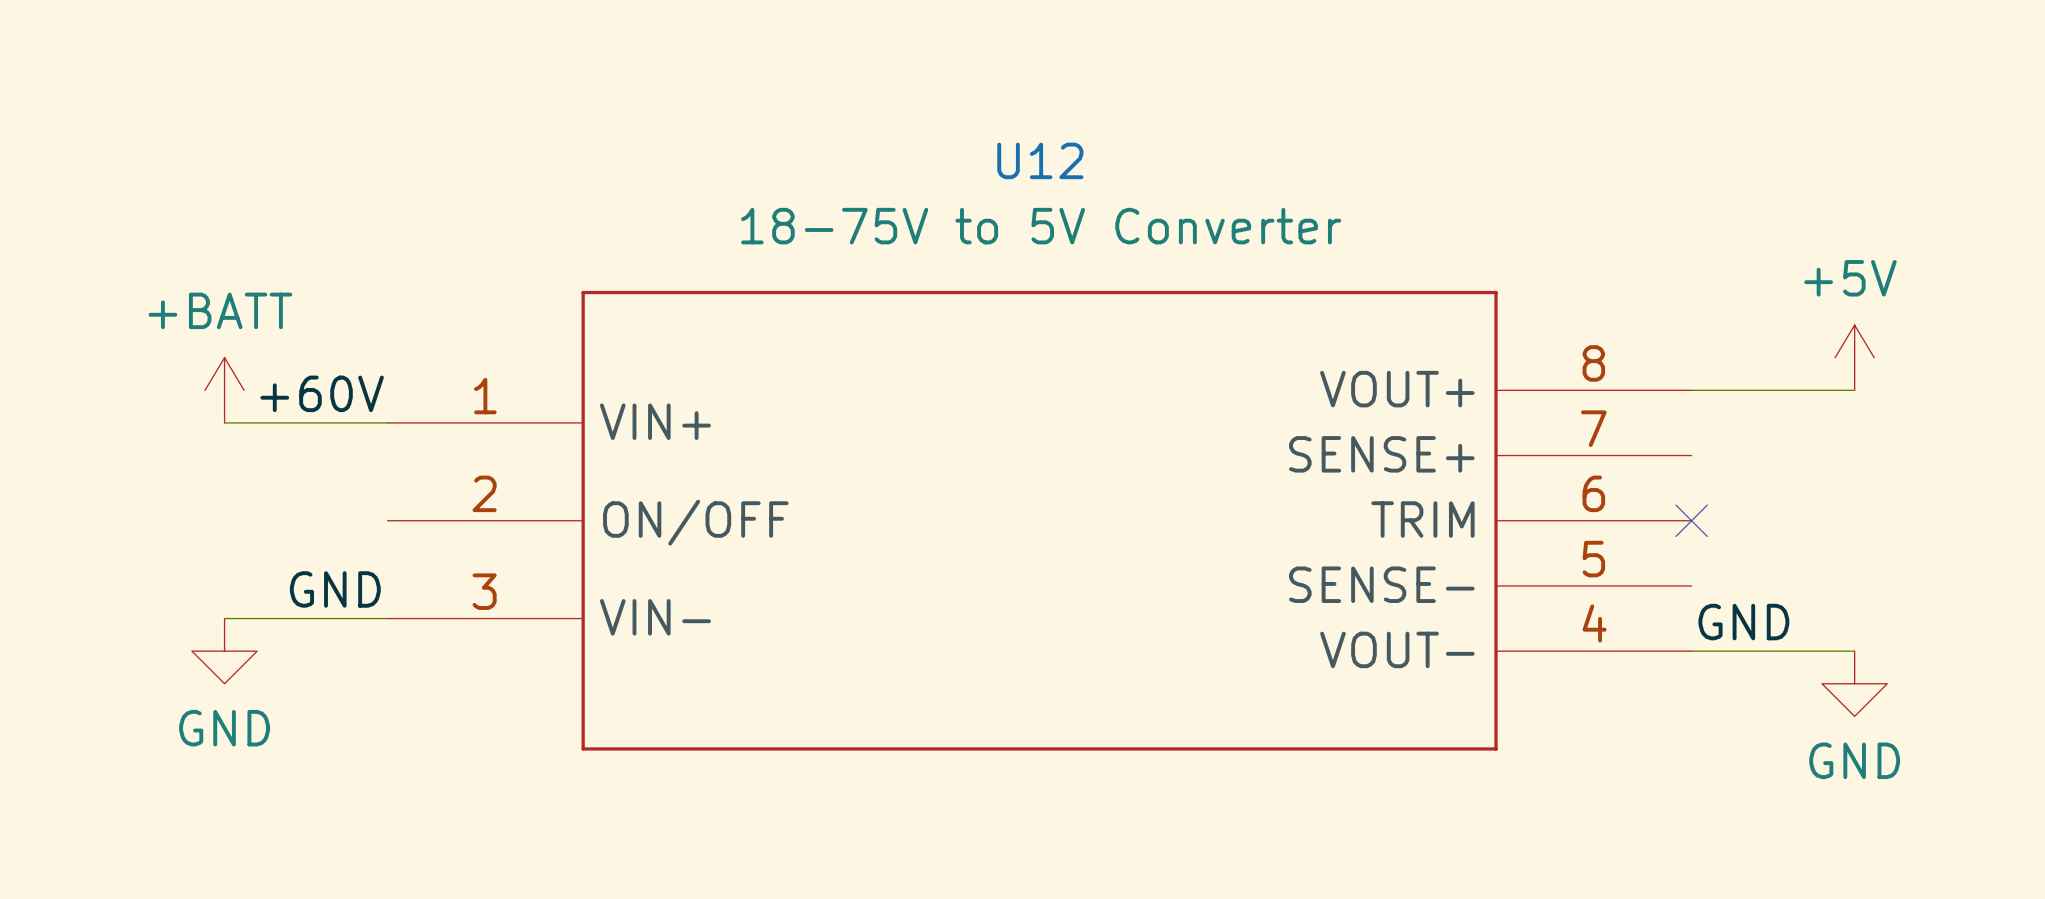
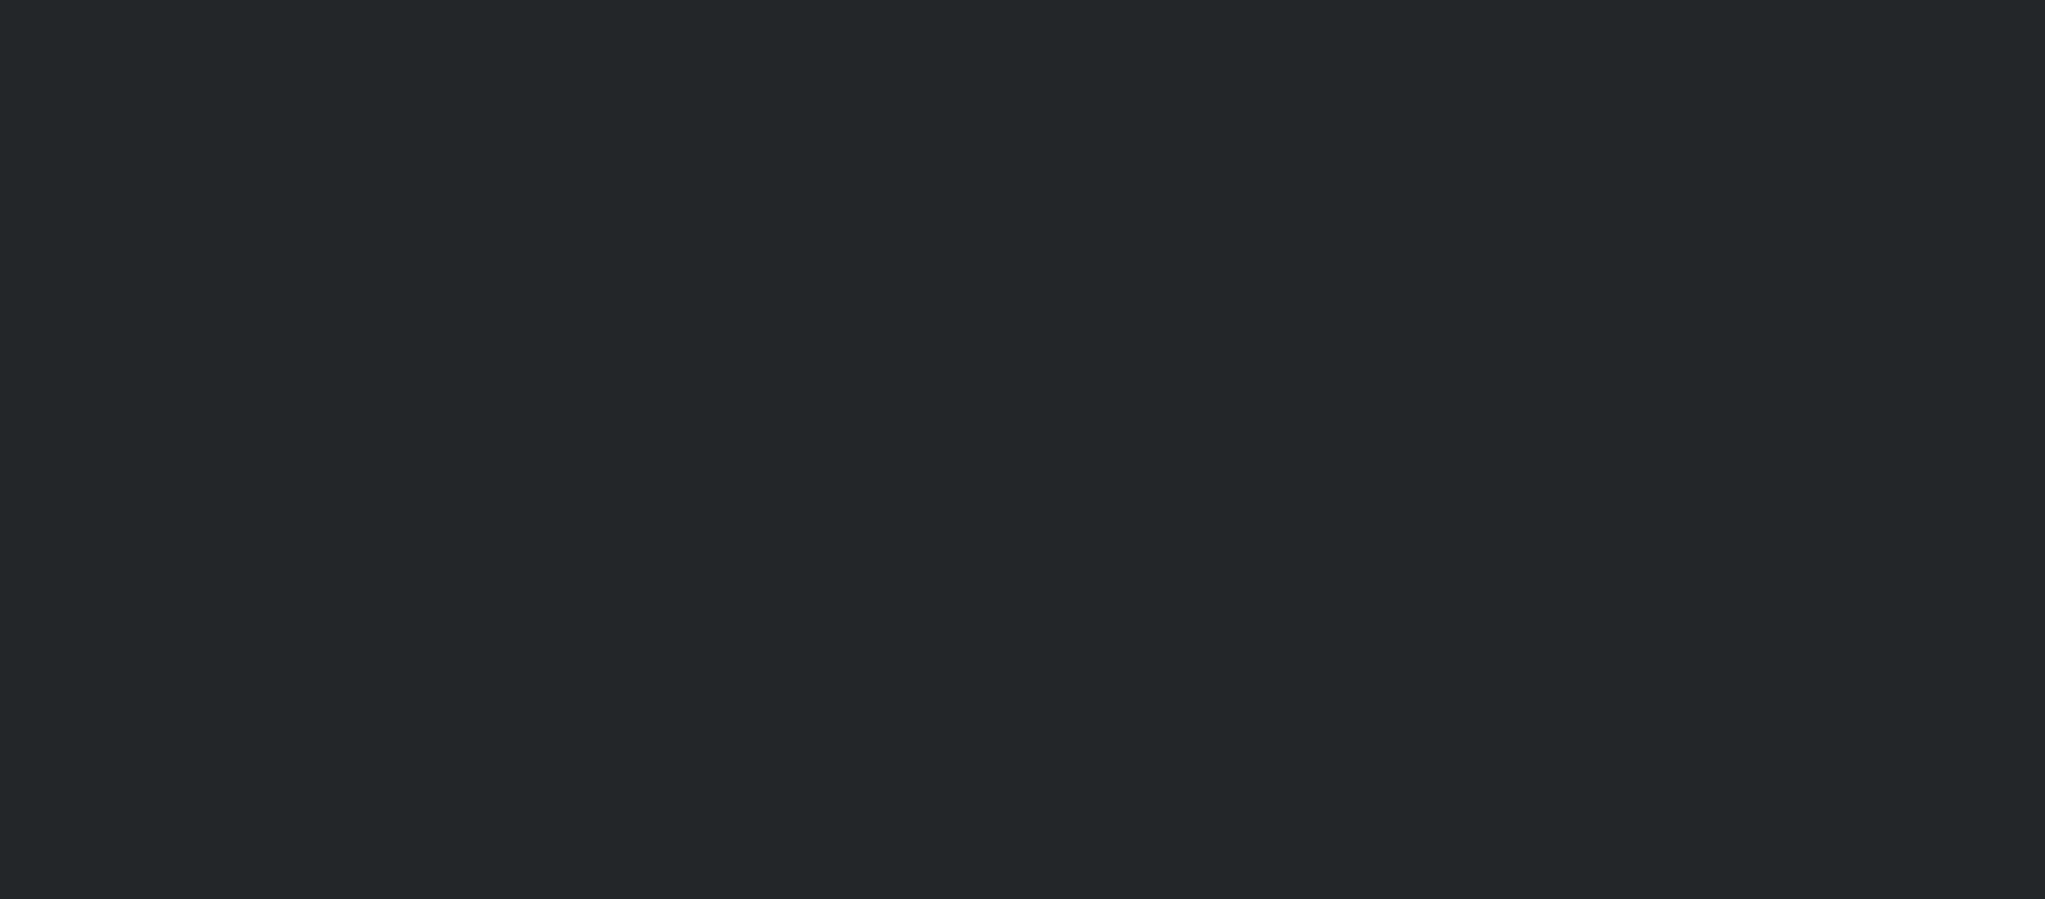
power symbol: +5V (1854, 357) -> none
power symbol: +BATT (224, 390) -> none
wire: (1691, 390) (1854, 390) -> none
label: +60V (322, 393) -> none
wire: (224, 422) (387, 422) -> none
U12: 18-75V to 5V Converter (1039, 520) -> none
no-connect mark: (1691, 520) -> none
label: GND (335, 589) -> none
wire: (224, 618) (387, 618) -> none
label: GND (1743, 622) -> none
power symbol: GND (224, 651) -> none
wire: (1691, 651) (1854, 651) -> none
power symbol: GND (1854, 683) -> none

